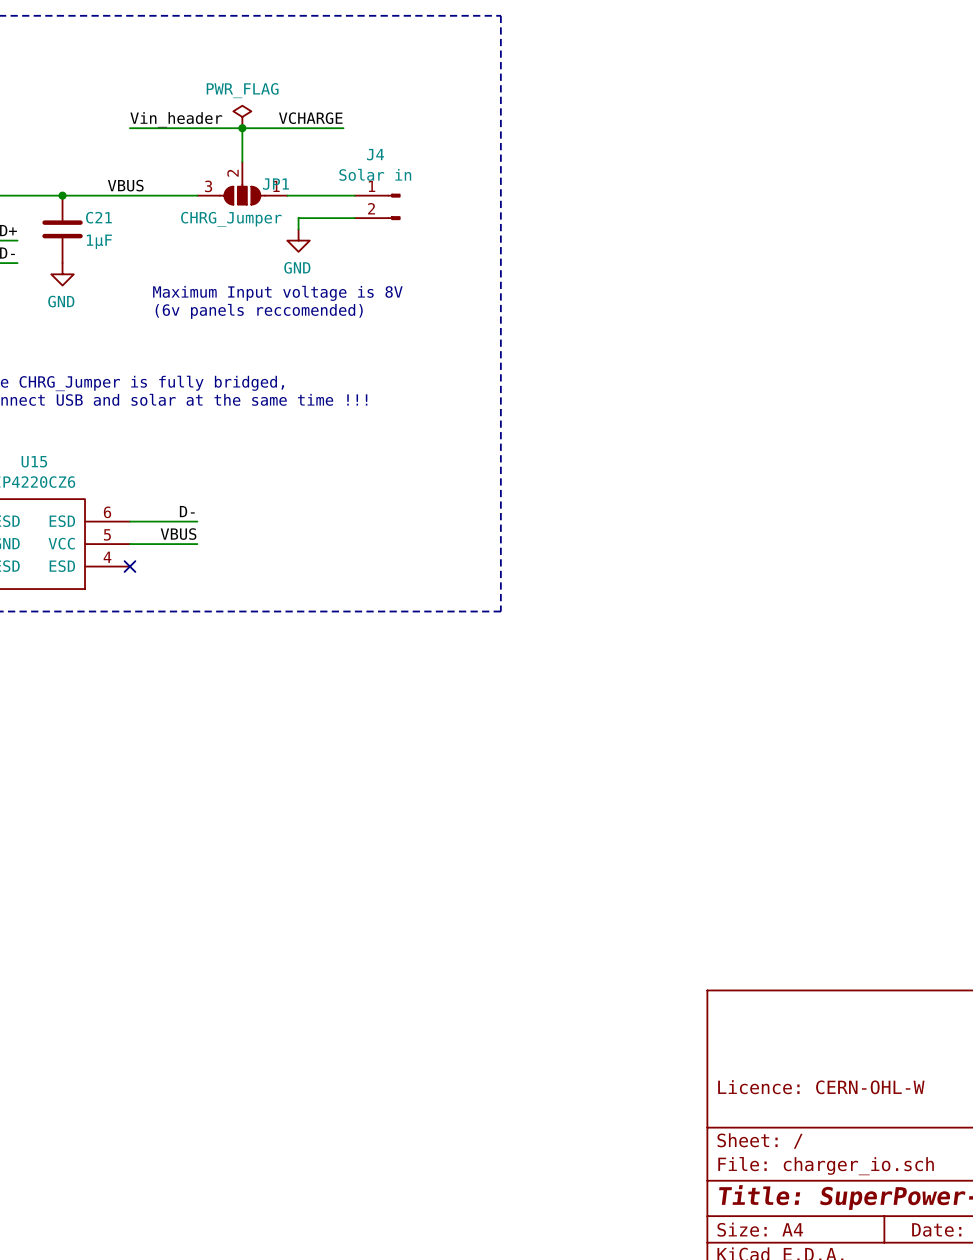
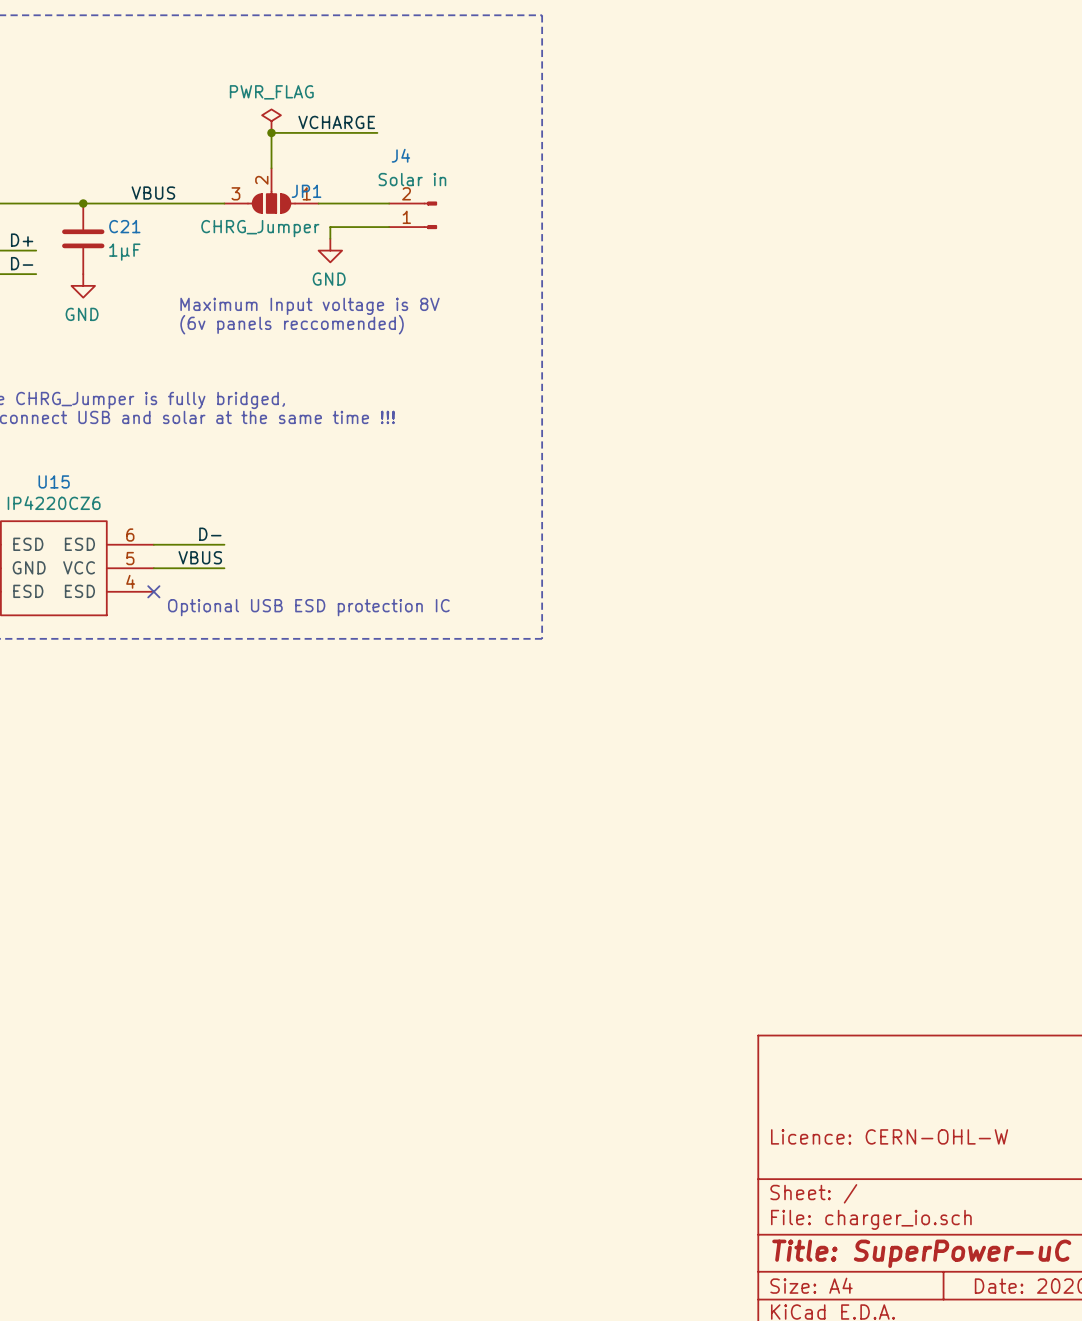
label: Vin_header (176, 119) -> none
wire: (129, 128) (242, 128) -> none
J4 flip: as is (394, 206) -> up-down (430, 215)
text: none -> Optional USB ESD protection IC (308, 607)

